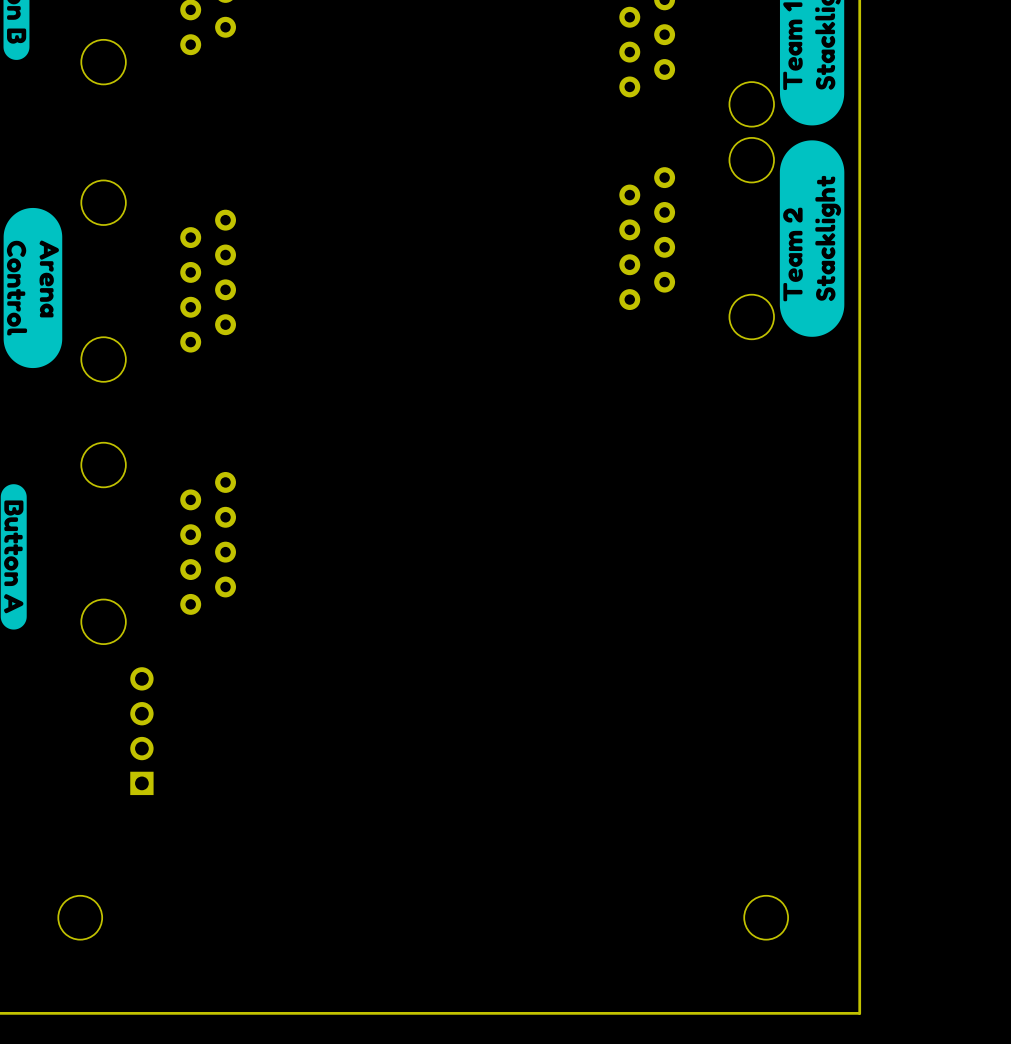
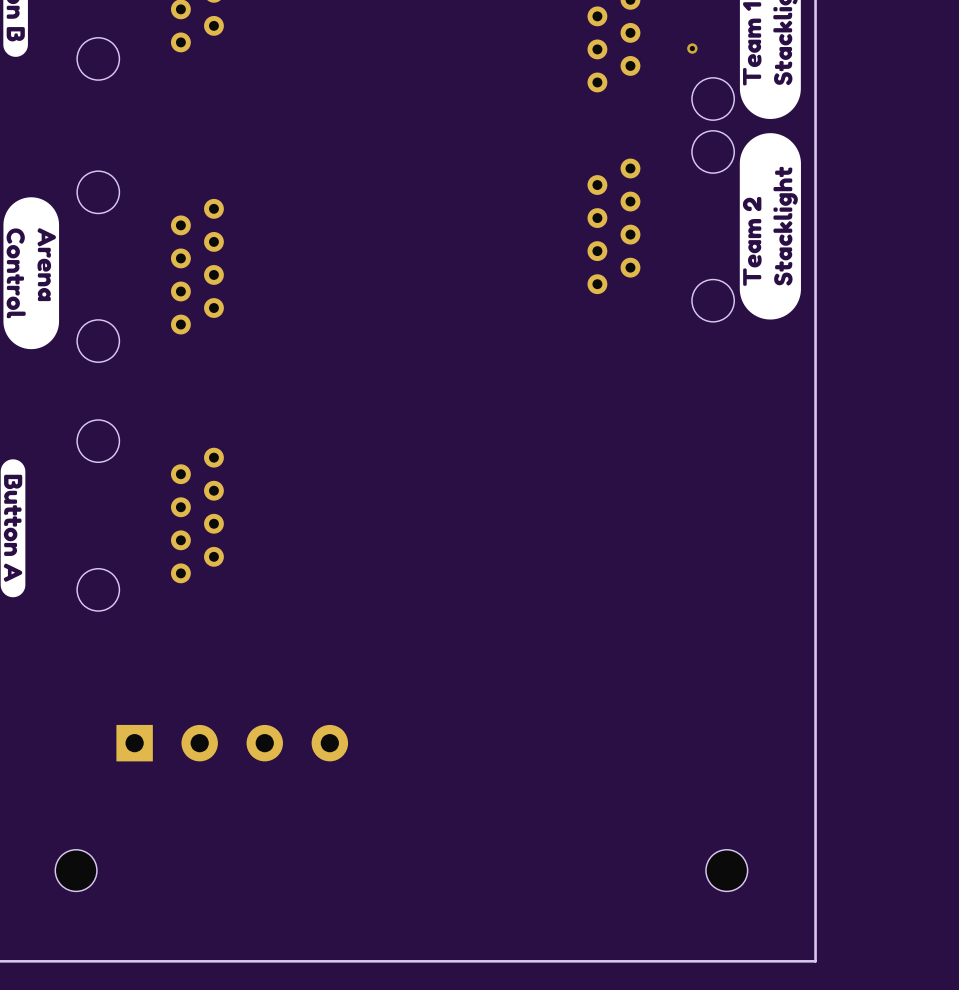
via: none -> (692, 48)
part: (141, 731) -> none
part: none -> (232, 743)

